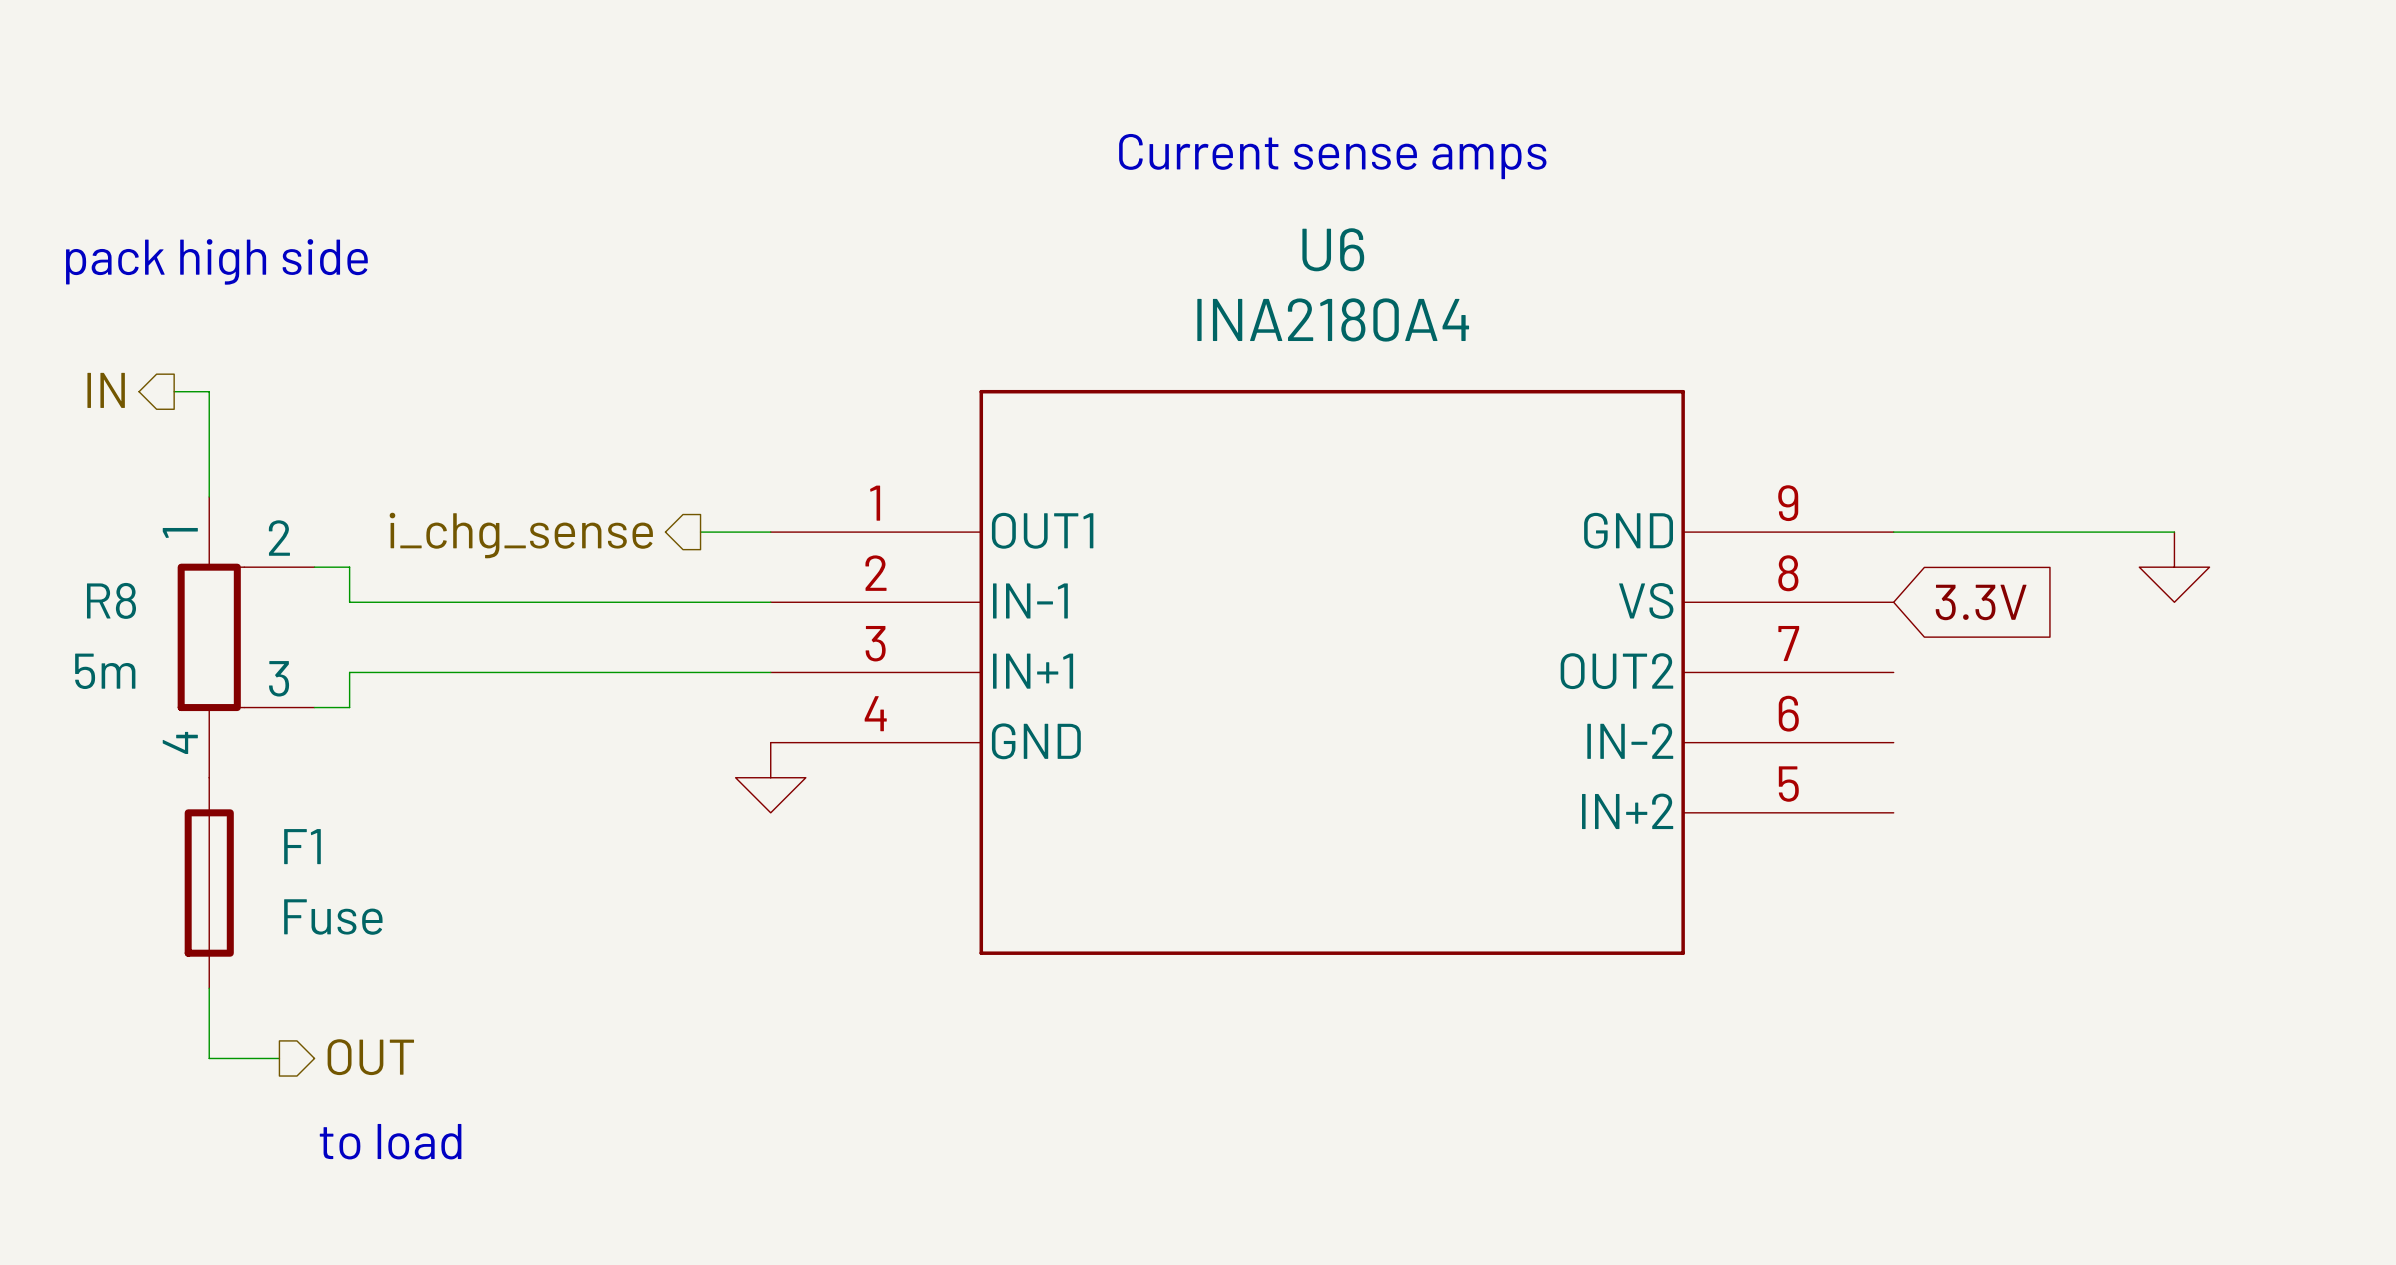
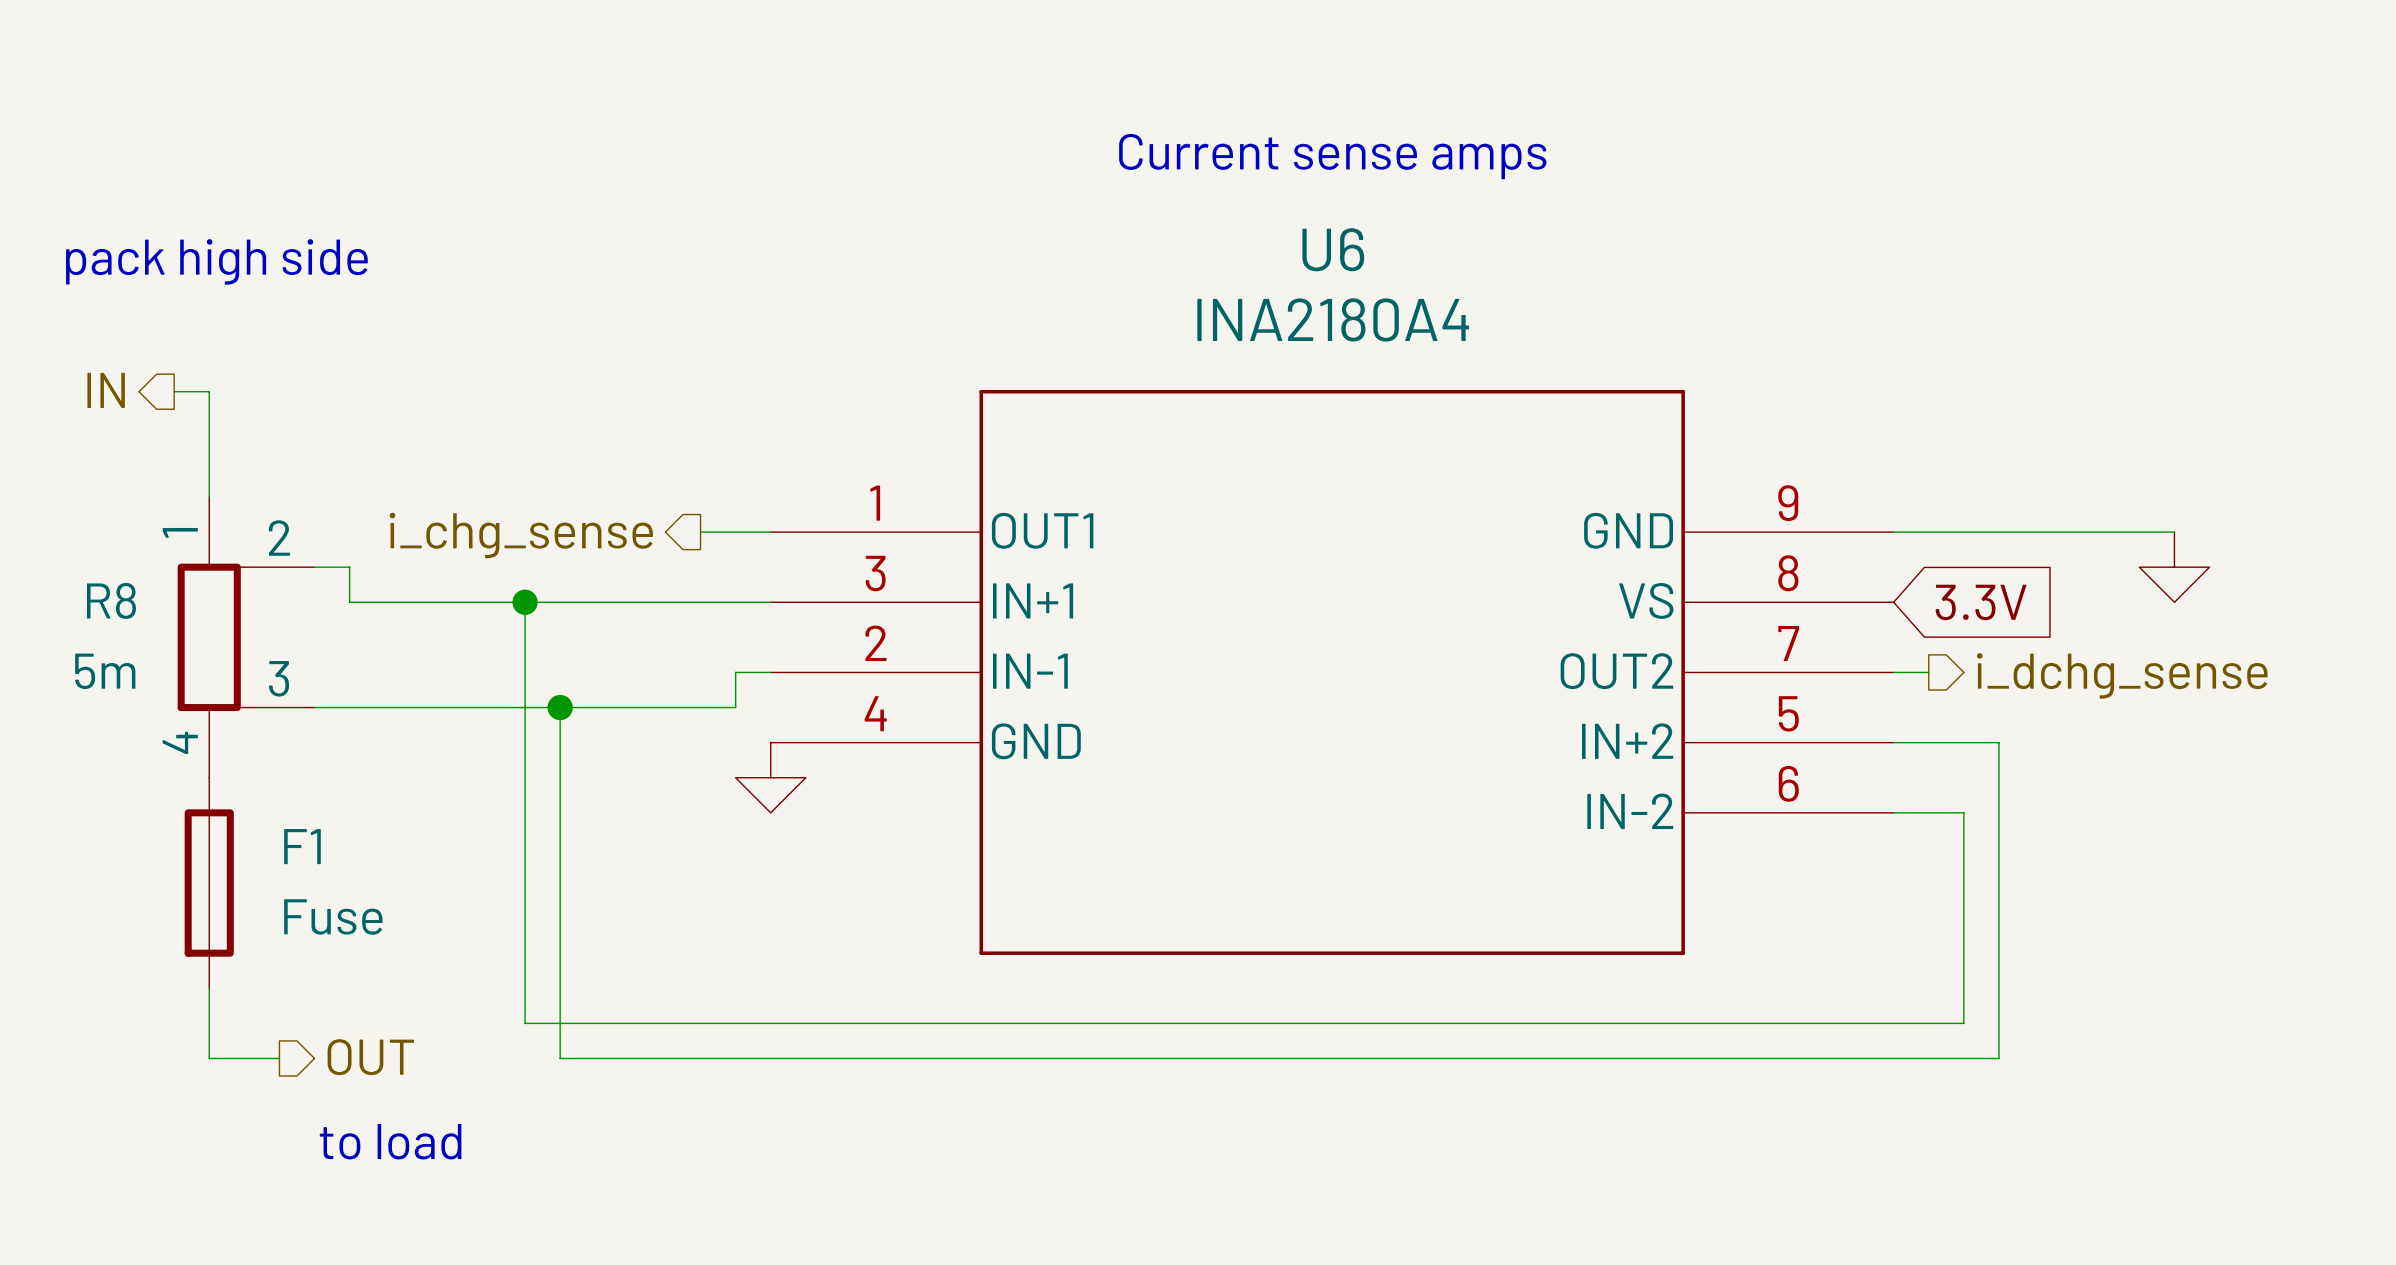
U6 pin number: 2 (875, 573) -> 3 (875, 573)
U6 pin name: IN-1 (1030, 600) -> IN+1 (1033, 600)
wire: none -> (525, 602) (525, 1023) (1963, 1023) (1963, 812) (1893, 812)
junction: none -> (525, 602)
U6 pin number: 3 (875, 643) -> 2 (875, 643)
U6 pin name: IN+1 (1033, 671) -> IN-1 (1030, 671)
wire: (735, 672) (349, 672) (349, 707) -> (735, 672) (735, 707) (349, 707)
wire: none -> (1893, 672) (1928, 672)
hierarchical label: none -> i_dchg_sense (2122, 675)
wire: none -> (560, 707) (560, 1058) (1998, 1058) (1998, 742) (1893, 742)
junction: none -> (560, 707)
U6 pin number: 6 (1788, 713) -> 5 (1788, 713)
U6 pin name: IN-2 (1630, 741) -> IN+2 (1627, 741)
U6 pin number: 5 (1788, 784) -> 6 (1788, 783)
U6 pin name: IN+2 (1627, 811) -> IN-2 (1630, 811)

